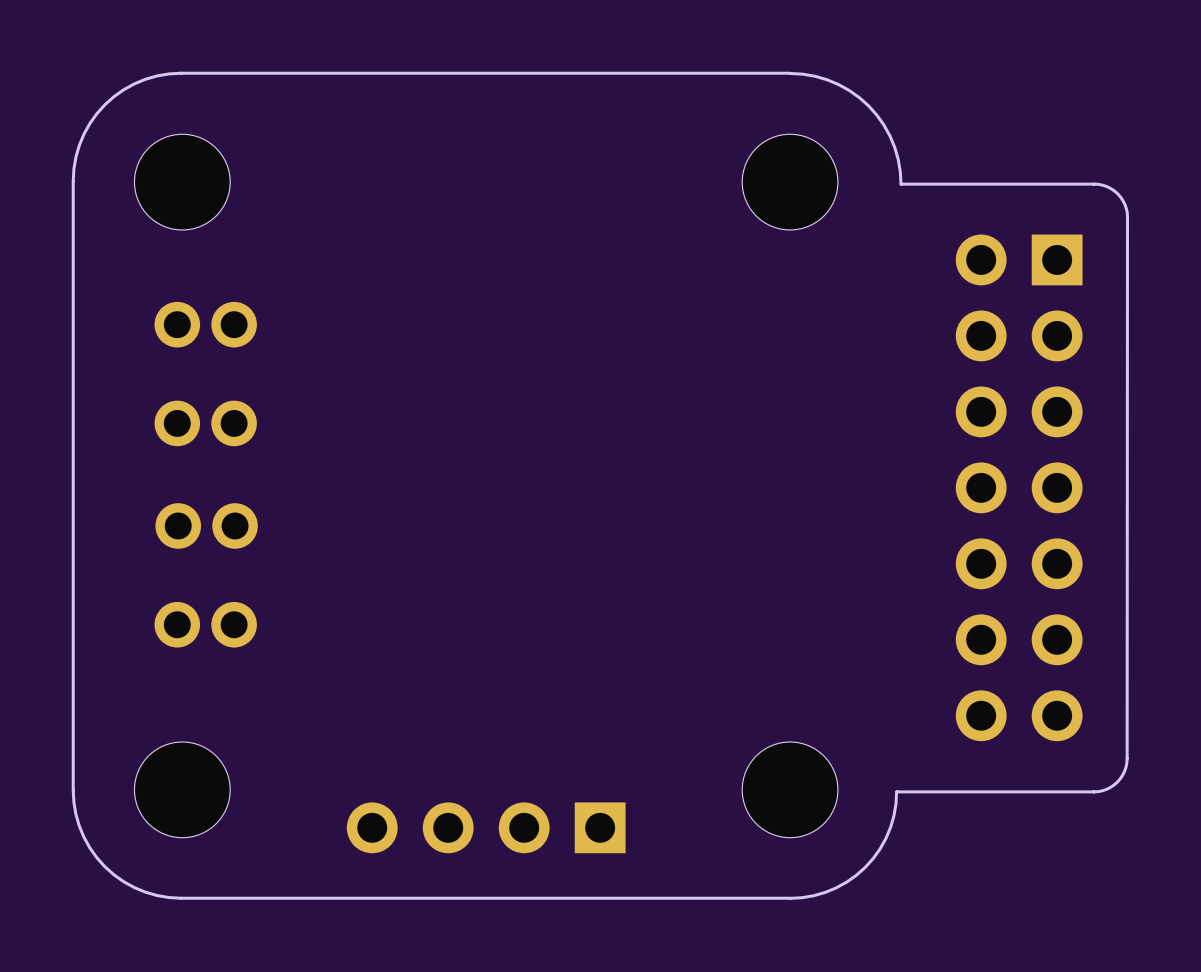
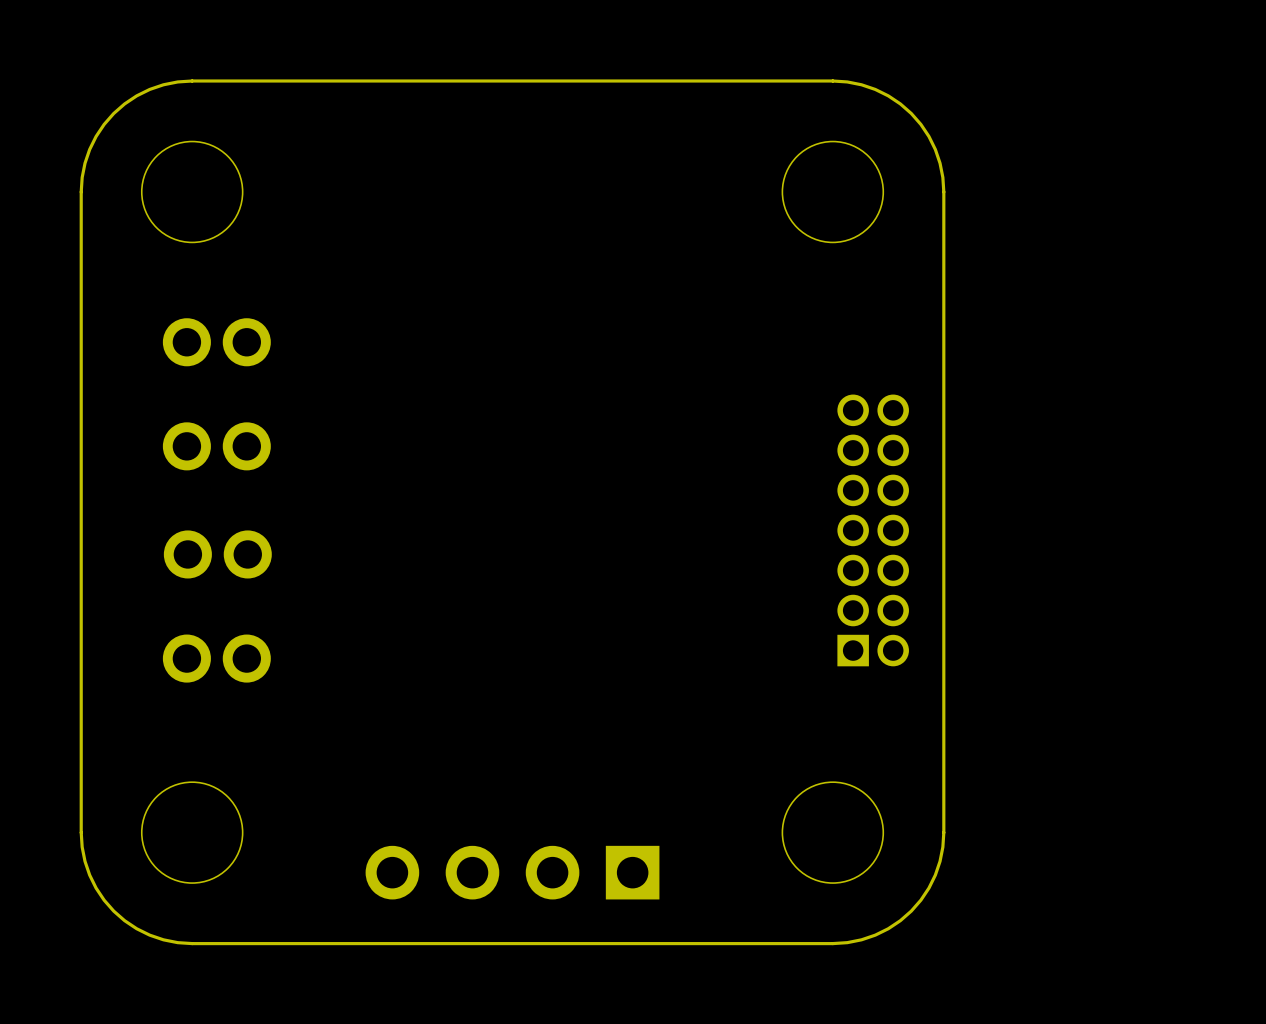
board edge: (790, 73) (181, 73) (145, 79) (123, 89) (104, 104) (89, 123) (79, 145) (73, 181) (73, 790) (75, 814) (83, 837) (96, 857) (113, 874) (145, 892) (169, 897) (802, 897) (836, 887) (865, 867) (886, 838) (893, 815) (896, 791) (1094, 791) -> none
board edge: (790, 73) (826, 79) (849, 90) (868, 105) (890, 136) (898, 159) (901, 184) (1094, 184) -> none
board edge: none -> (832, 81) (192, 81) (163, 84) (136, 95) (124, 103) (104, 124) (89, 149) (85, 163) (81, 191) (81, 832) (85, 861) (96, 888) (104, 900) (124, 920) (149, 935) (163, 939) (192, 943) (832, 943) (861, 939) (888, 928) (911, 911) (920, 900) (935, 875) (940, 861) (943, 832) (942, 177) (940, 163) (928, 136) (911, 113) (900, 103) (875, 89) (861, 84) (832, 81)
board edge: (1094, 184) (1106, 186) (1117, 193) (1125, 204) (1127, 217) -> none
board edge: (1127, 217) (1127, 758) (1124, 771) (1117, 782) (1106, 789) (1093, 791) -> none
part: (1019, 487) -> none
part: none -> (873, 530)

